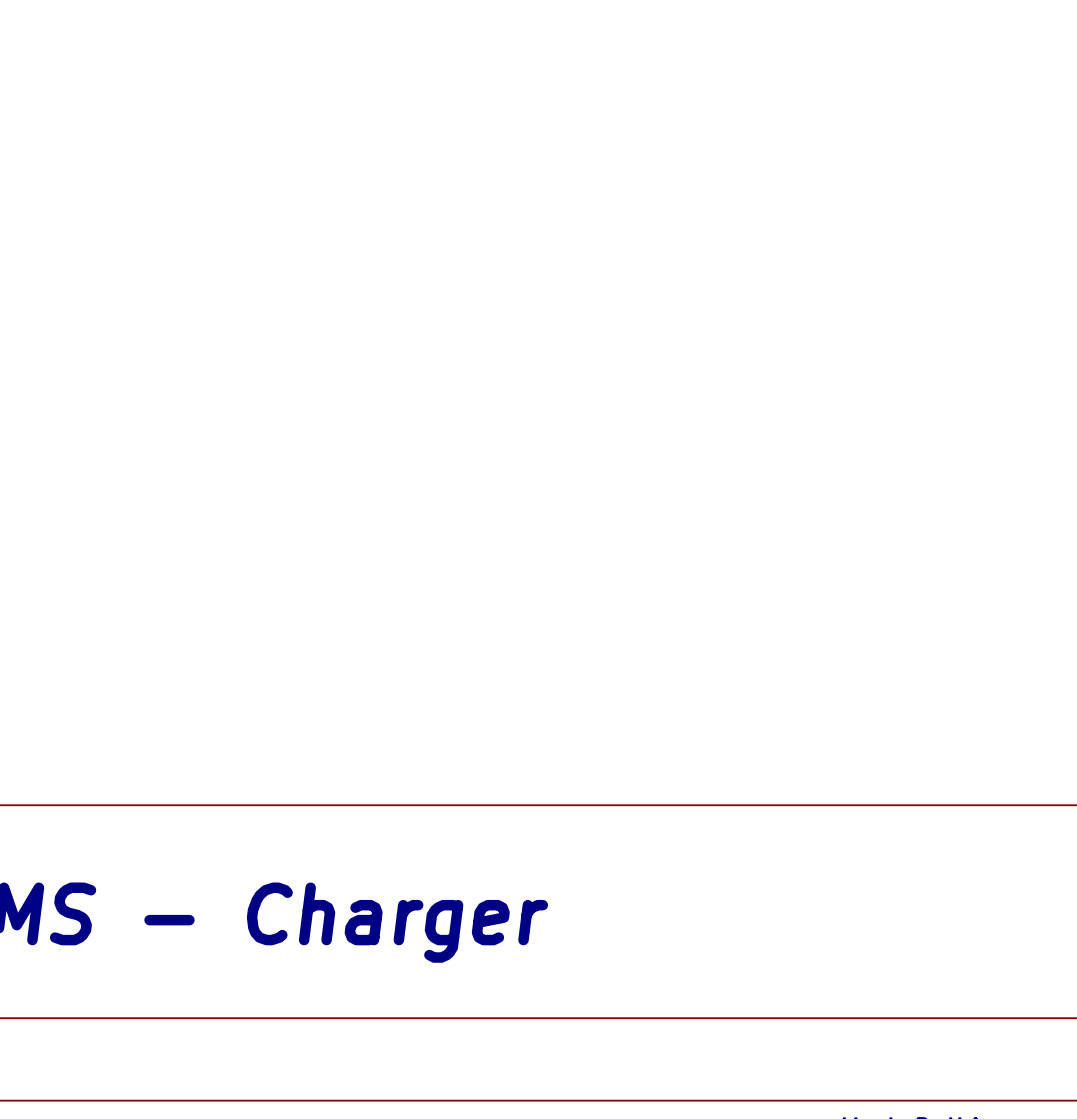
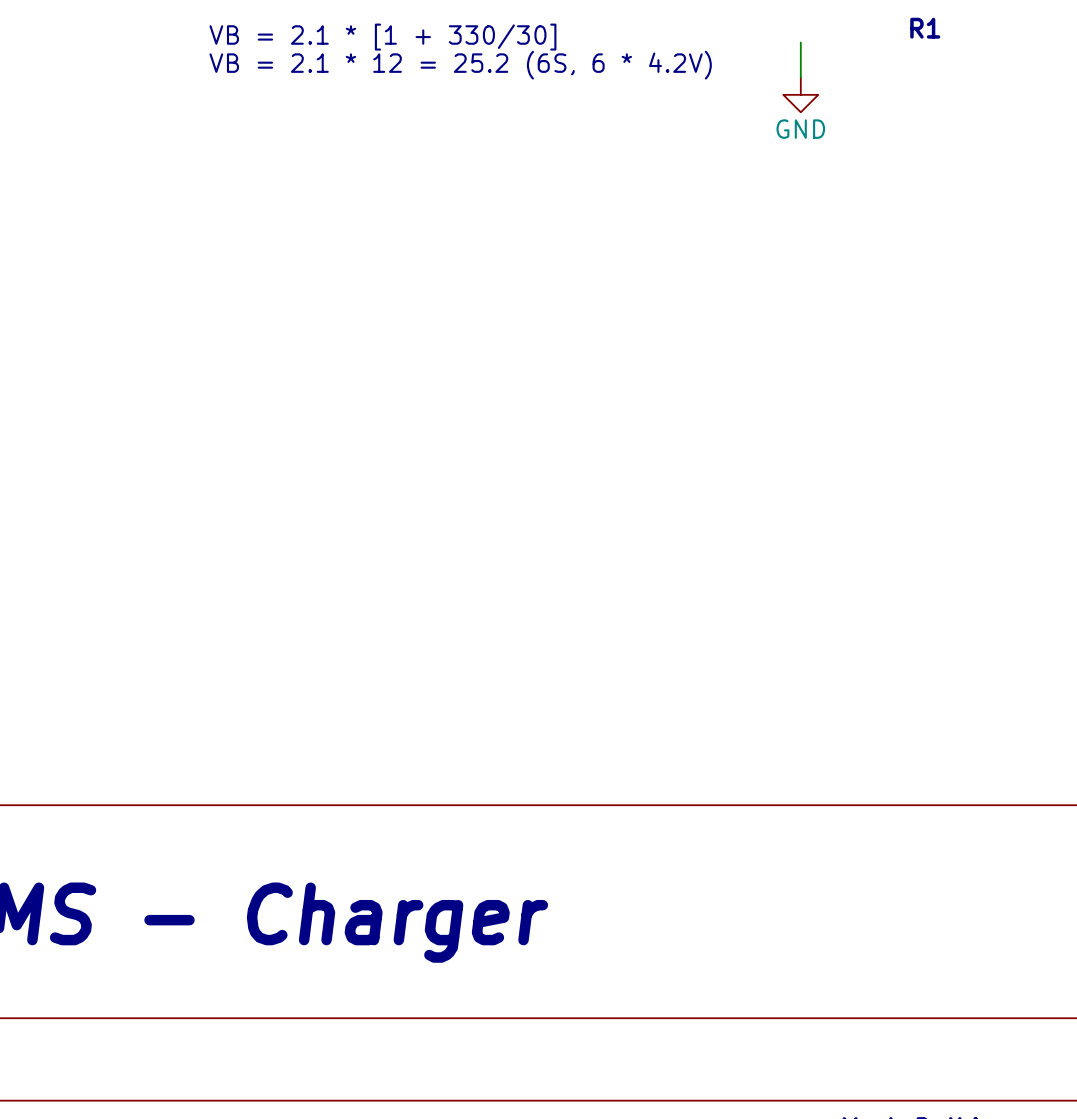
text: none -> R1 (925, 28)
text: none -> VB = 2.1 * [1 + 330/30] (382, 37)
wire: none -> (800, 42) (800, 77)
text: none -> VB = 2.1 * 12 = 25.2 (6S, 6 * 4.2V) (460, 65)
power symbol: none -> GND (800, 94)

